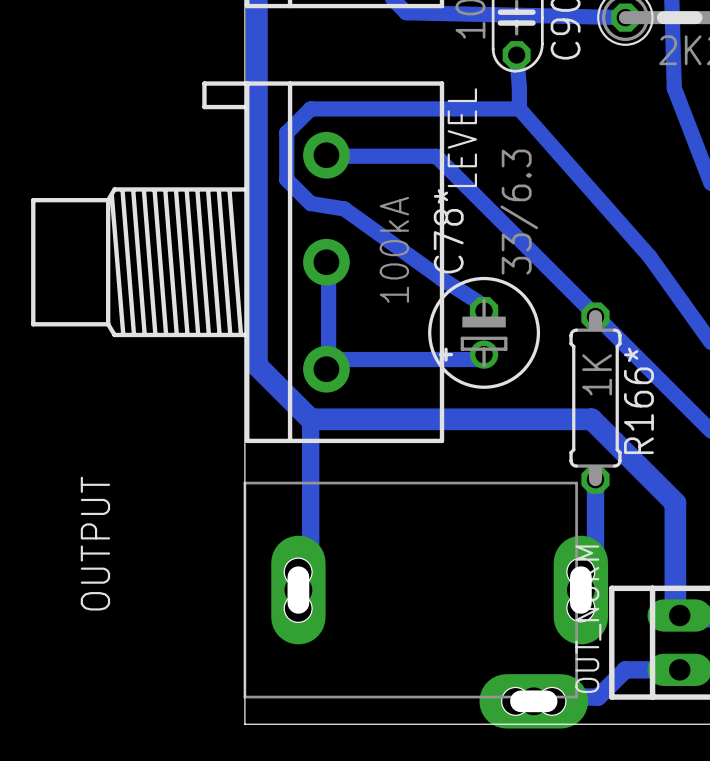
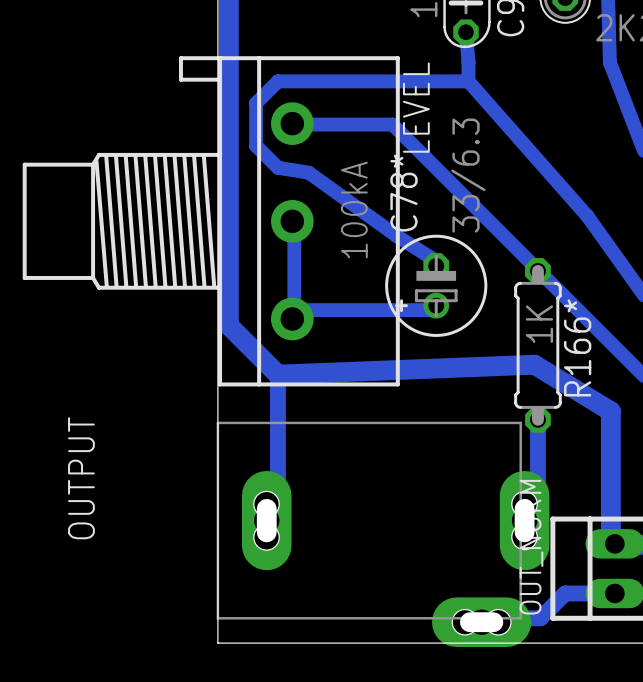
bottom track: (256, 365) (310, 419) -> none
bottom track: (310, 419) (591, 419) (675, 503) -> (228, 315) (228, 325) (277, 374) (534, 364) (610, 411) (610, 441)

